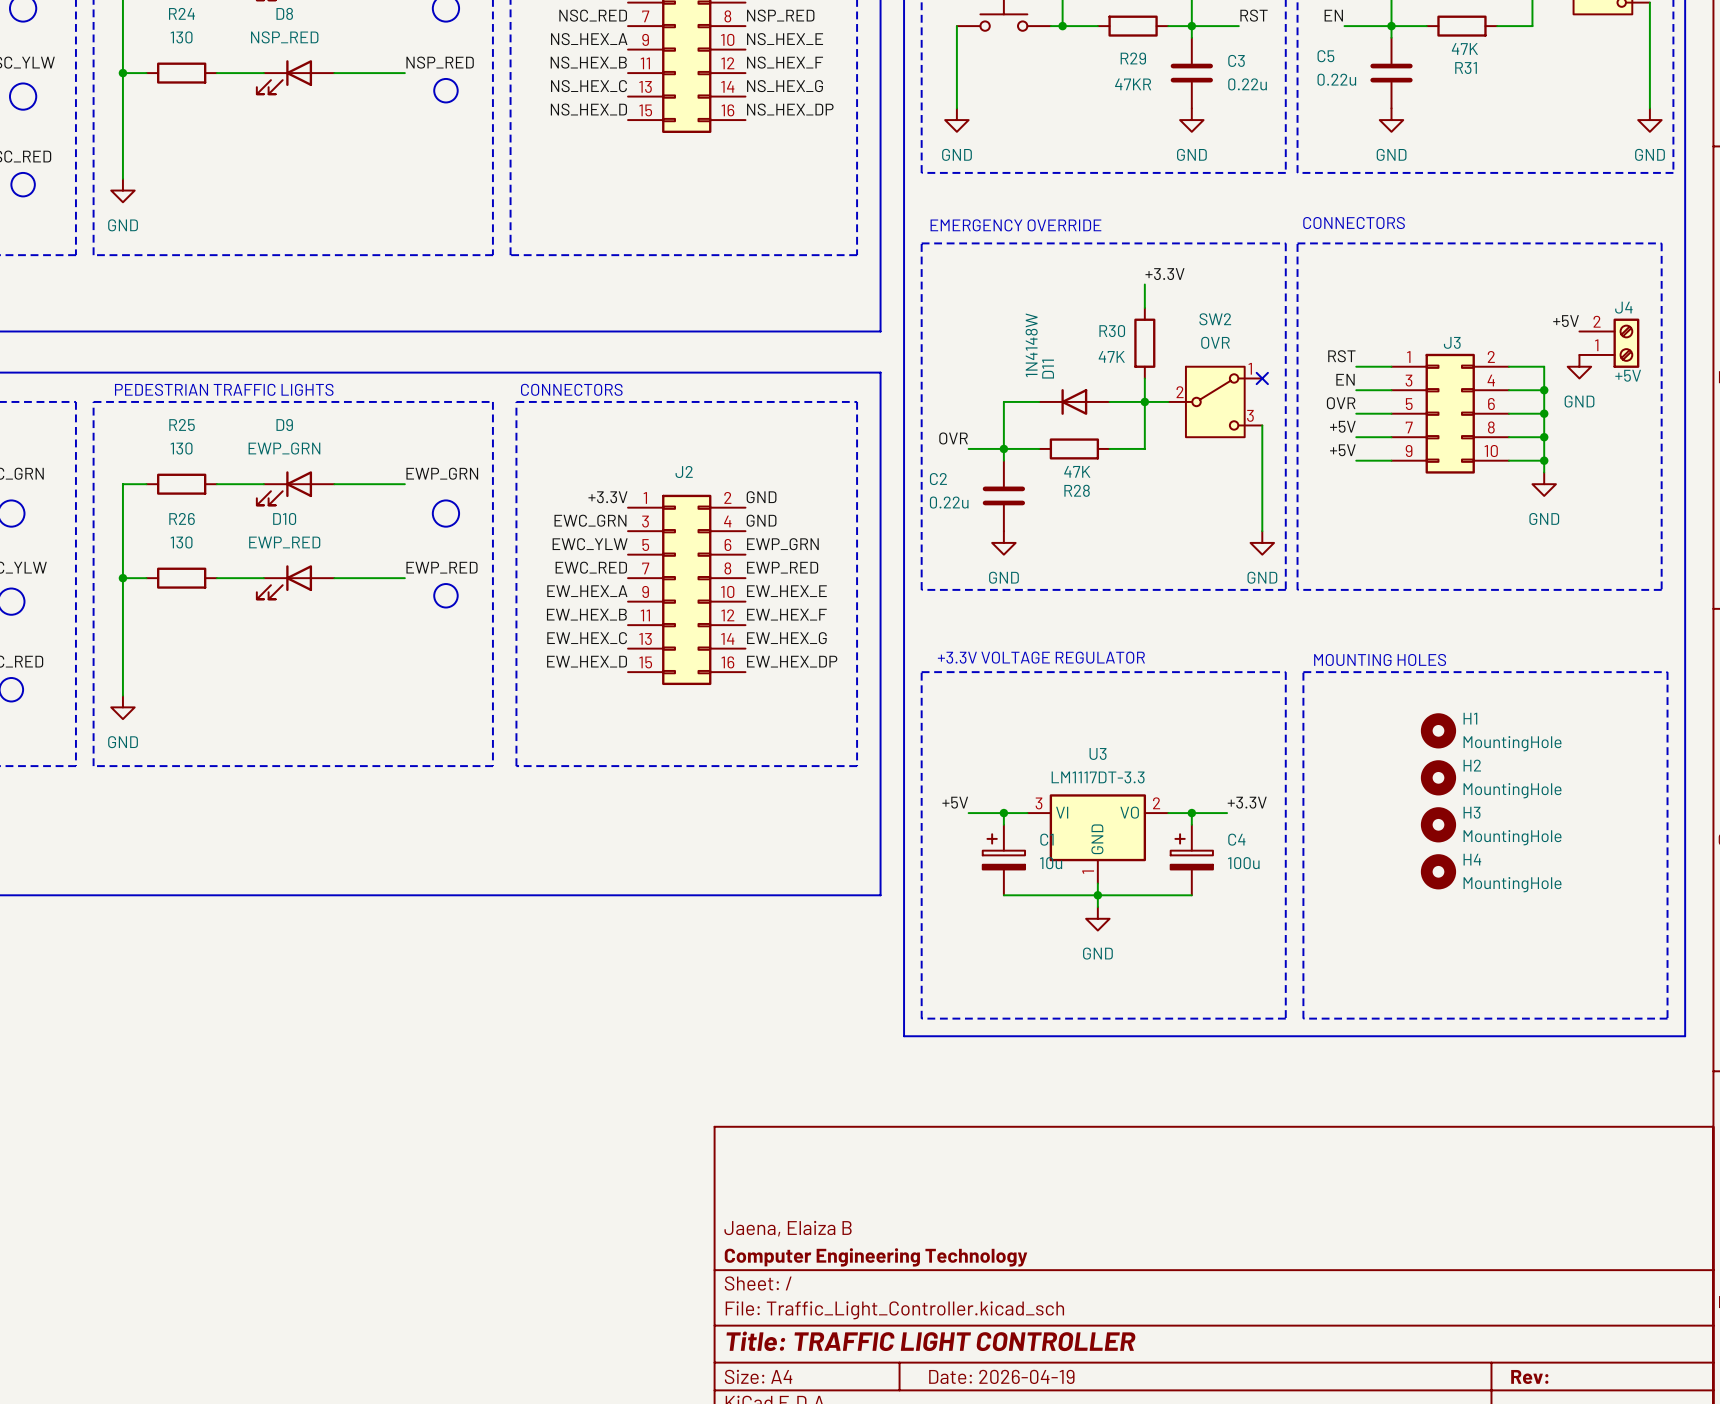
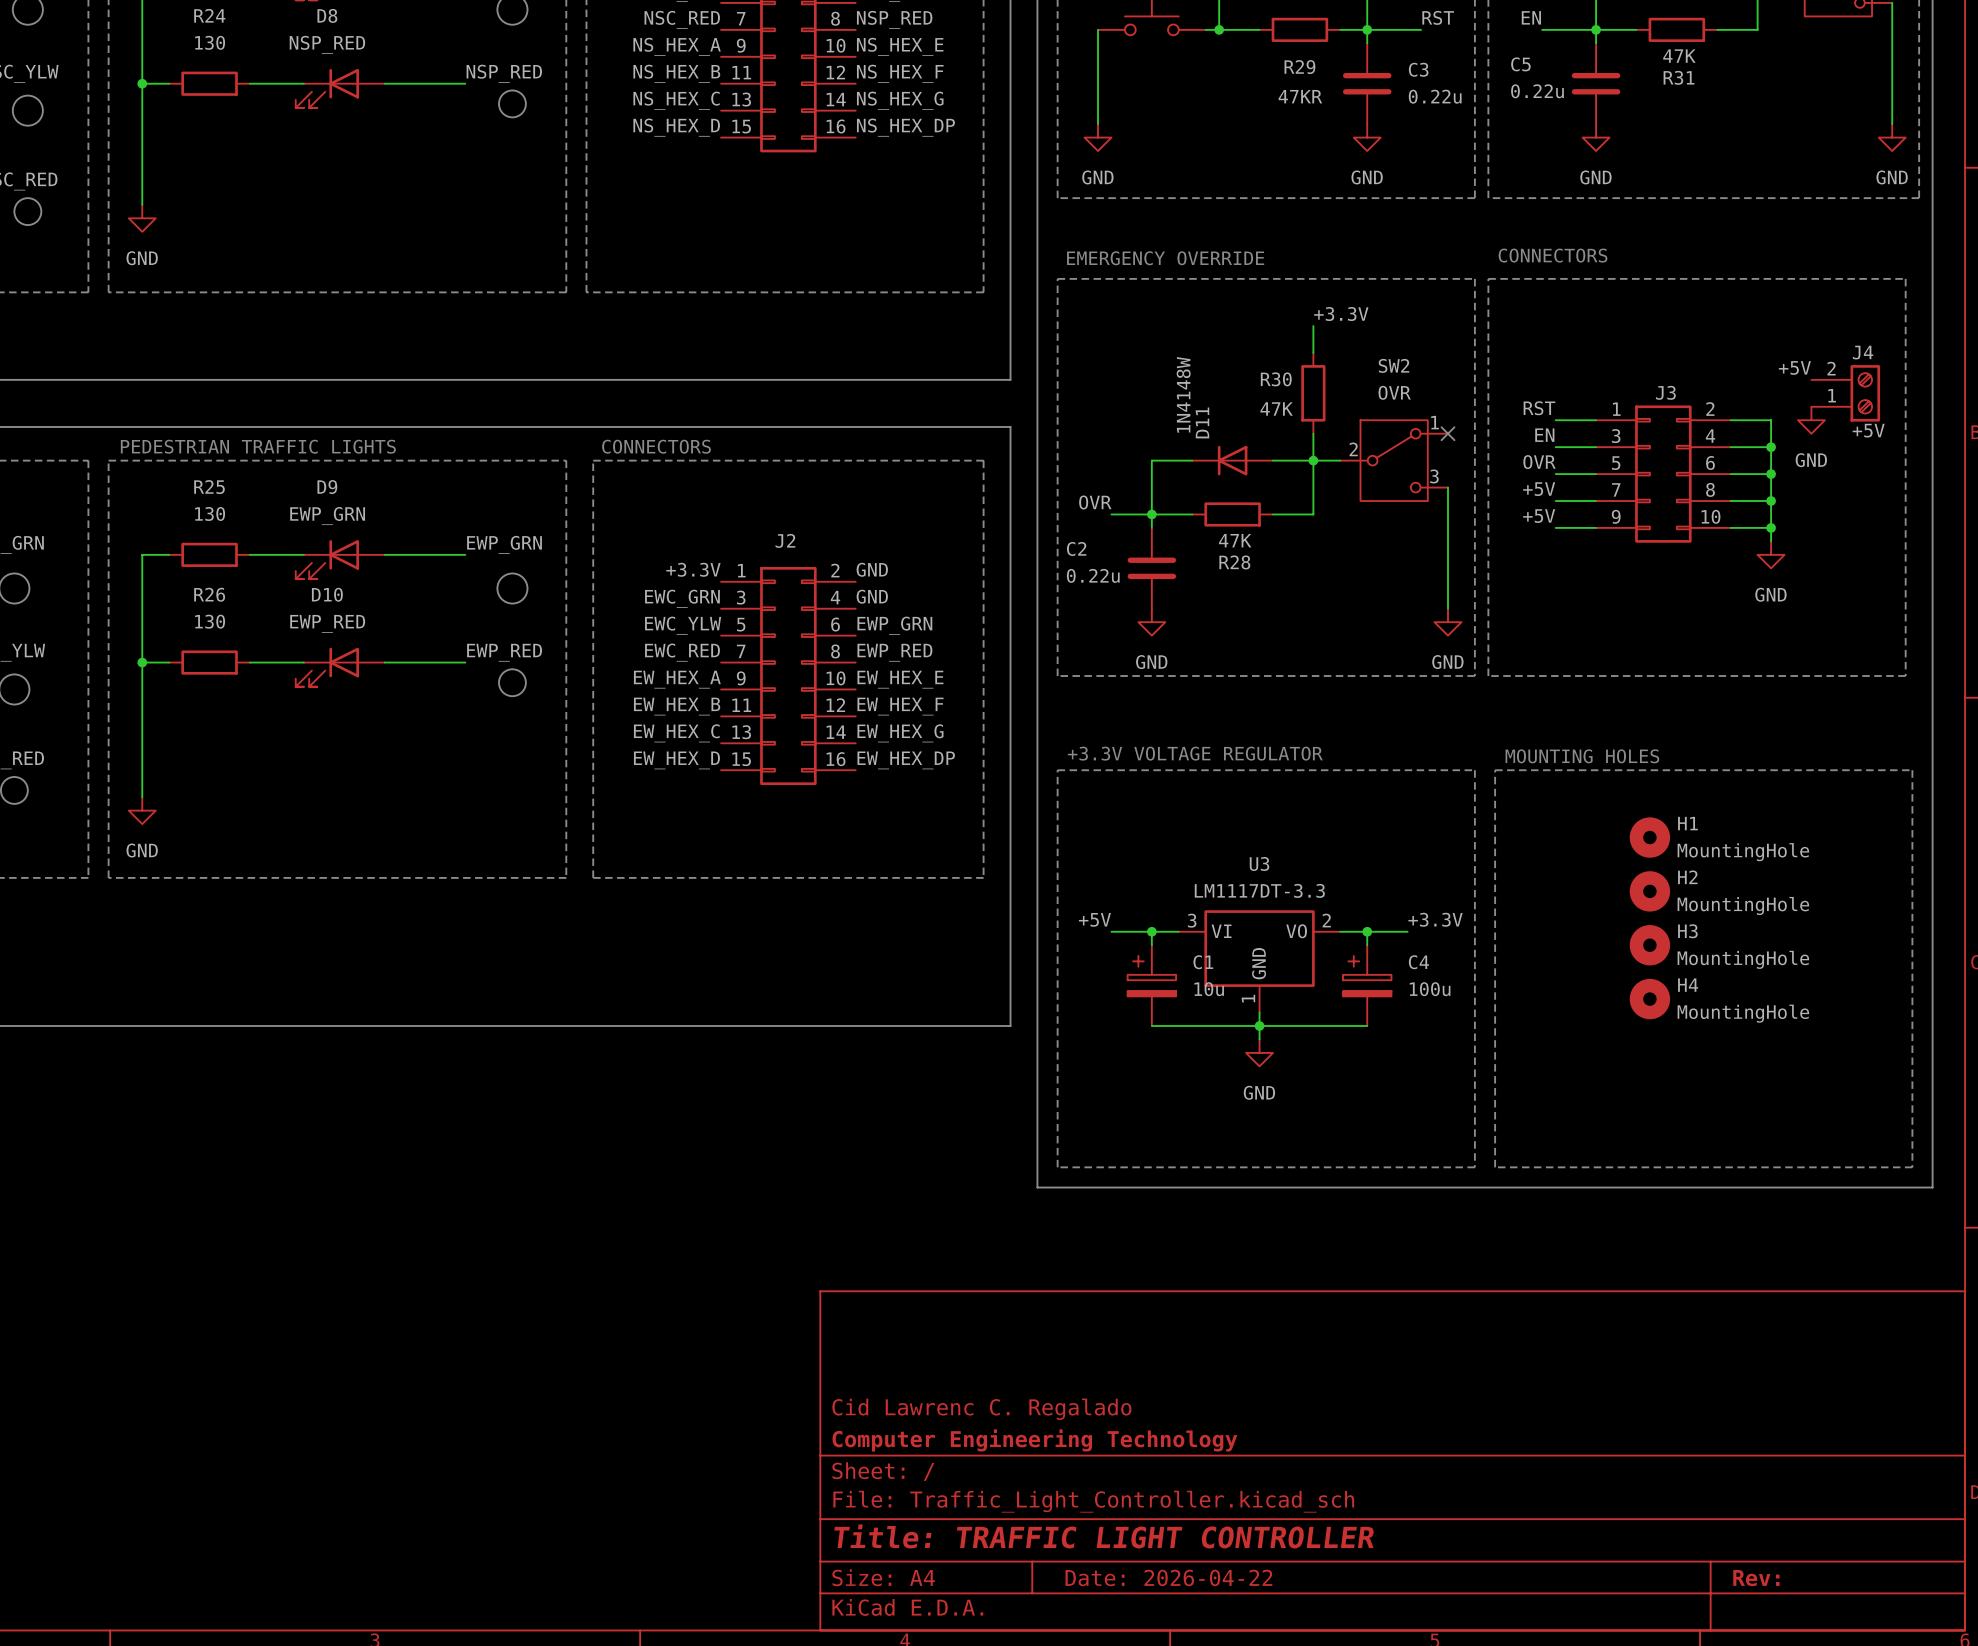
title block: Jaena, Elaiza B (788, 1228) -> Cid Lawrenc C. Regalado (981, 1409)
title block: Date: 2026-04-19 (1001, 1376) -> Date: 2026-04-22 (1168, 1577)

